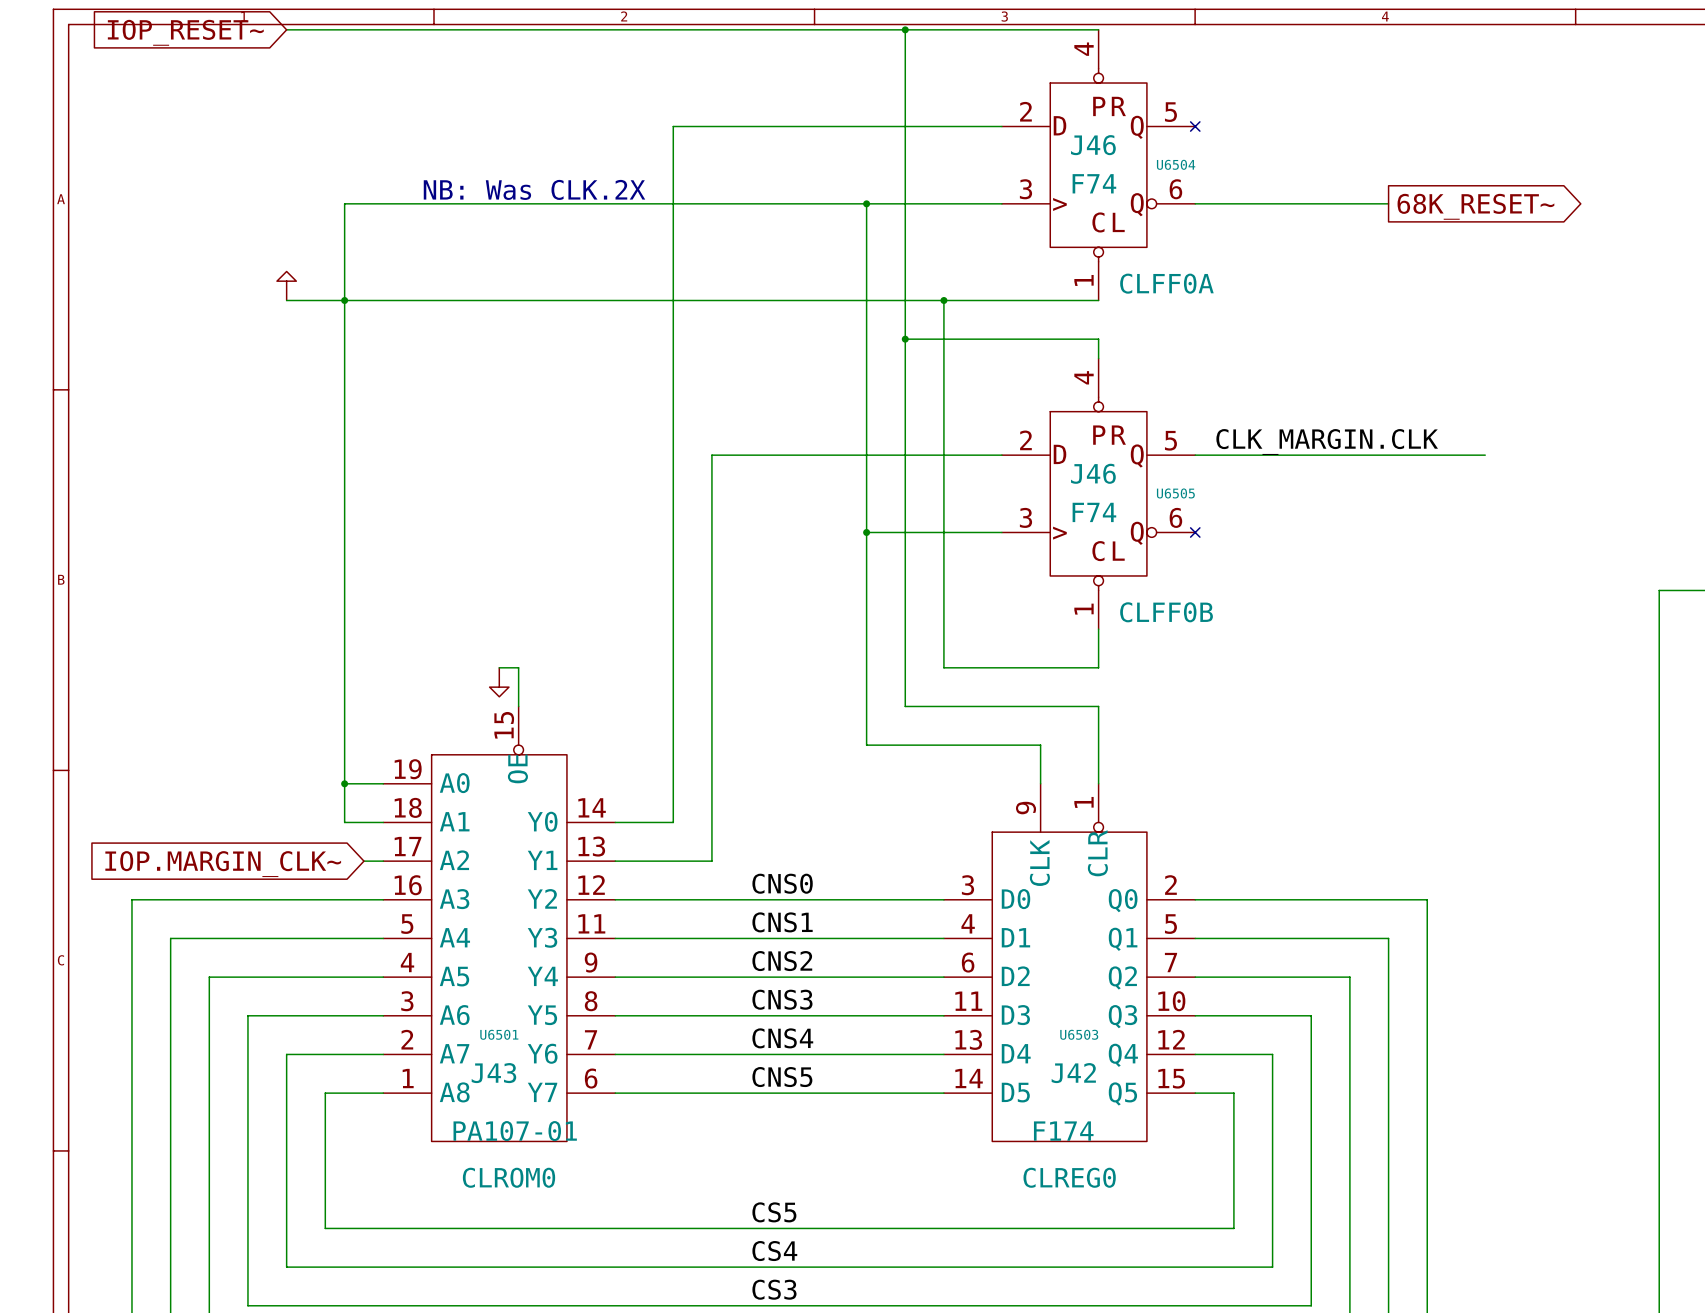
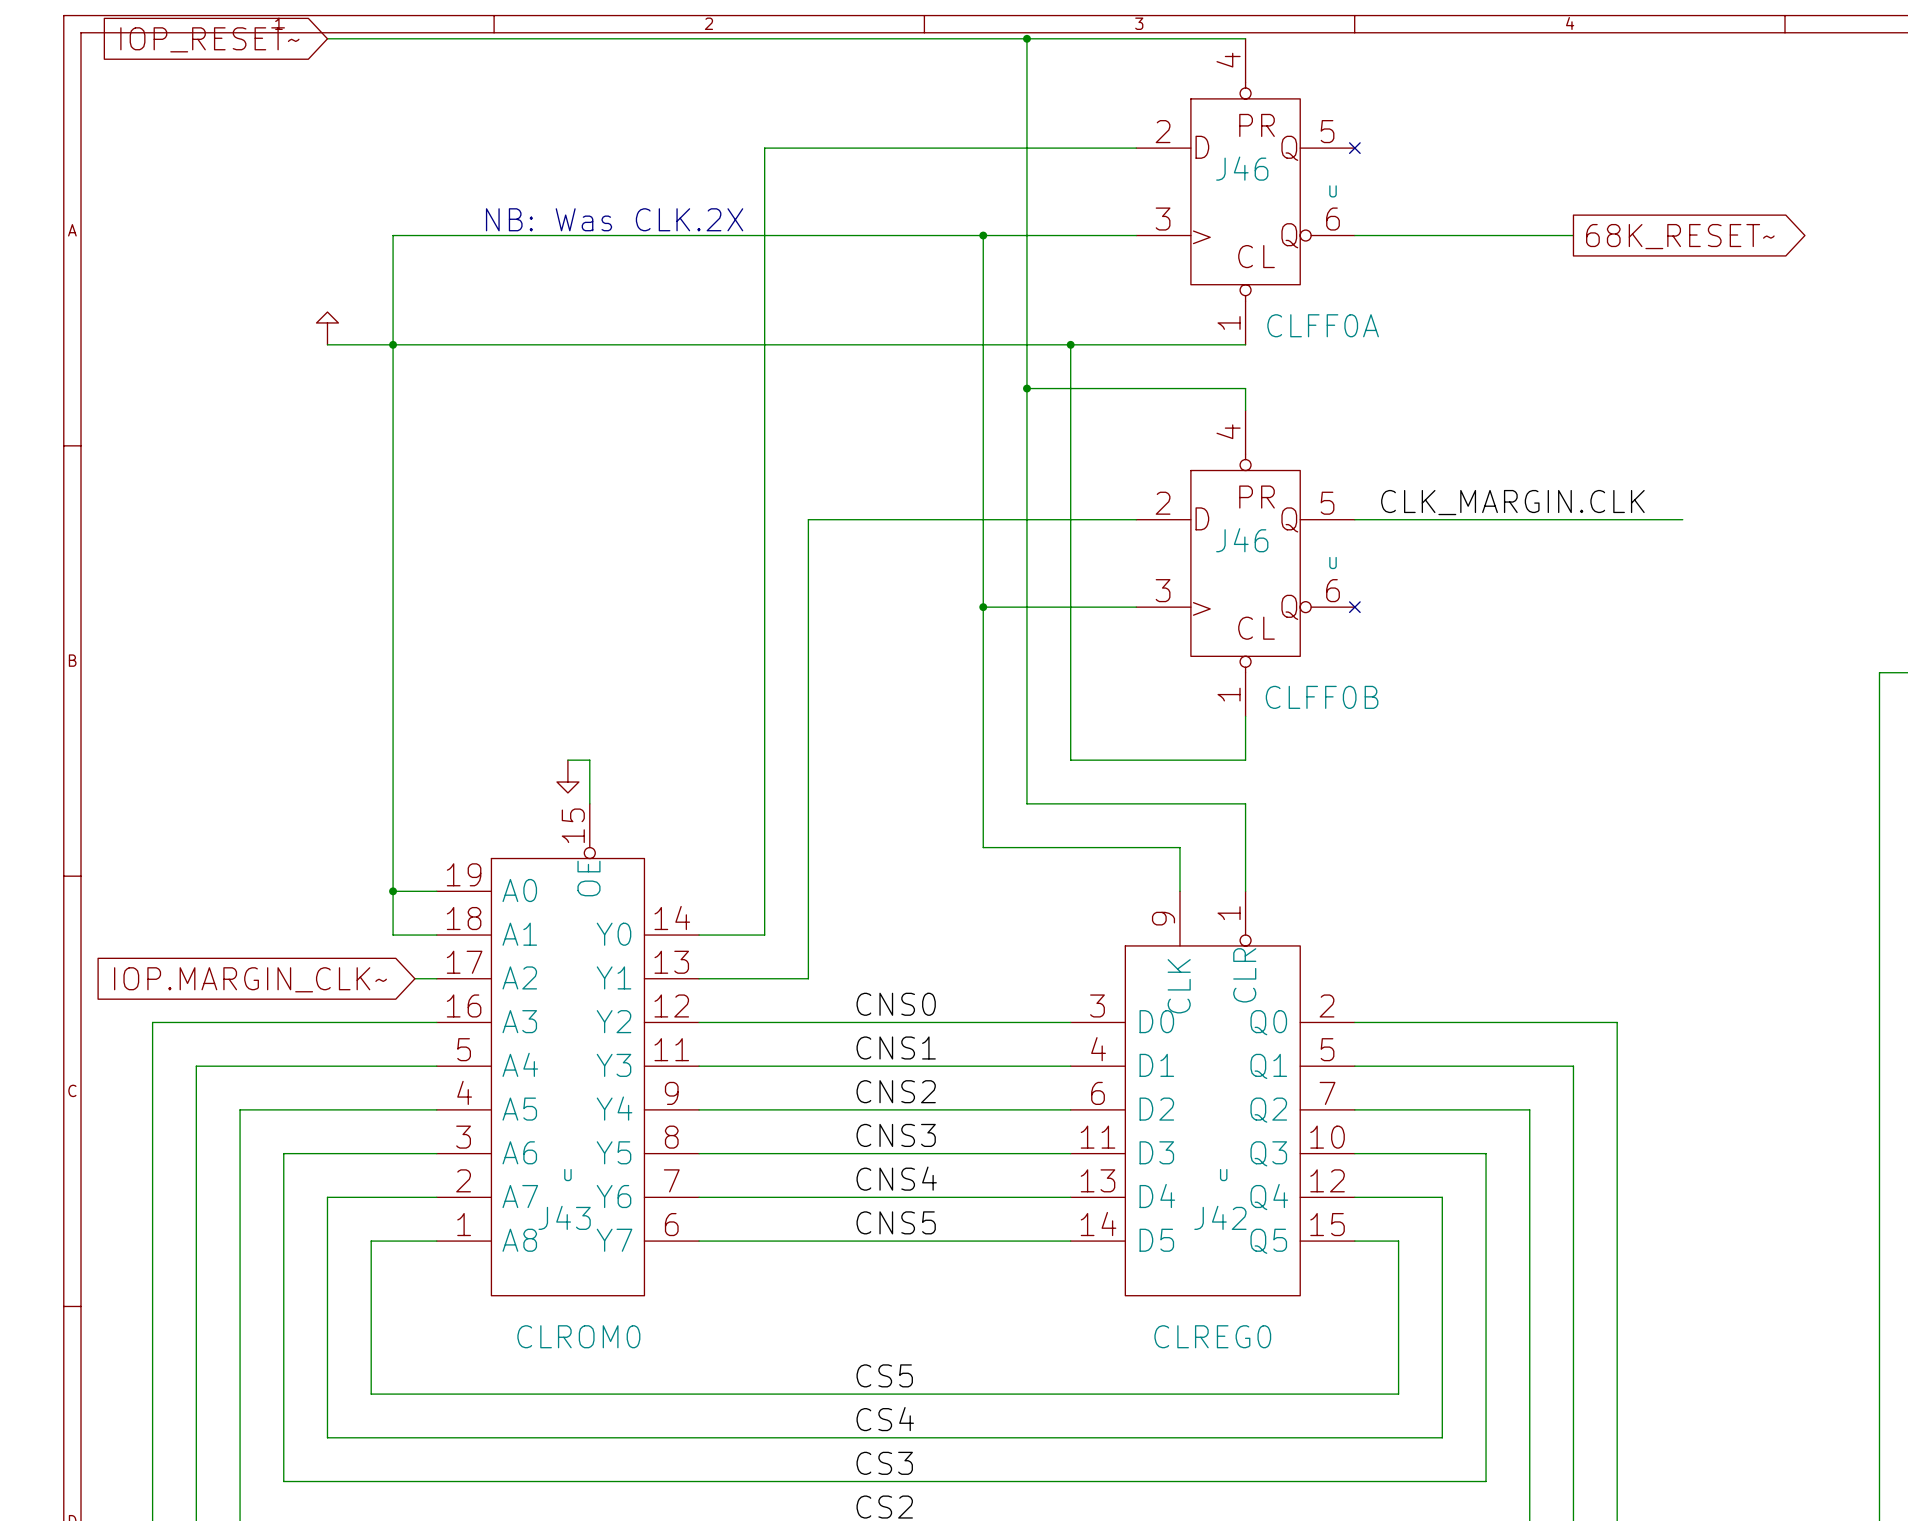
U6504 name: U6504 (1176, 164) -> U (1333, 191)
U6504 value: F74 (1094, 183) -> none
U6505 name: U6505 (1175, 493) -> U (1333, 563)
U6505 value: F74 (1094, 512) -> none
U6501 name: U6501 (499, 1034) -> U (567, 1175)
U6503 name: U6503 (1079, 1034) -> U (1223, 1175)
U6501 value: PA107-01 (515, 1131) -> none
U6503 value: F174 (1063, 1131) -> none

